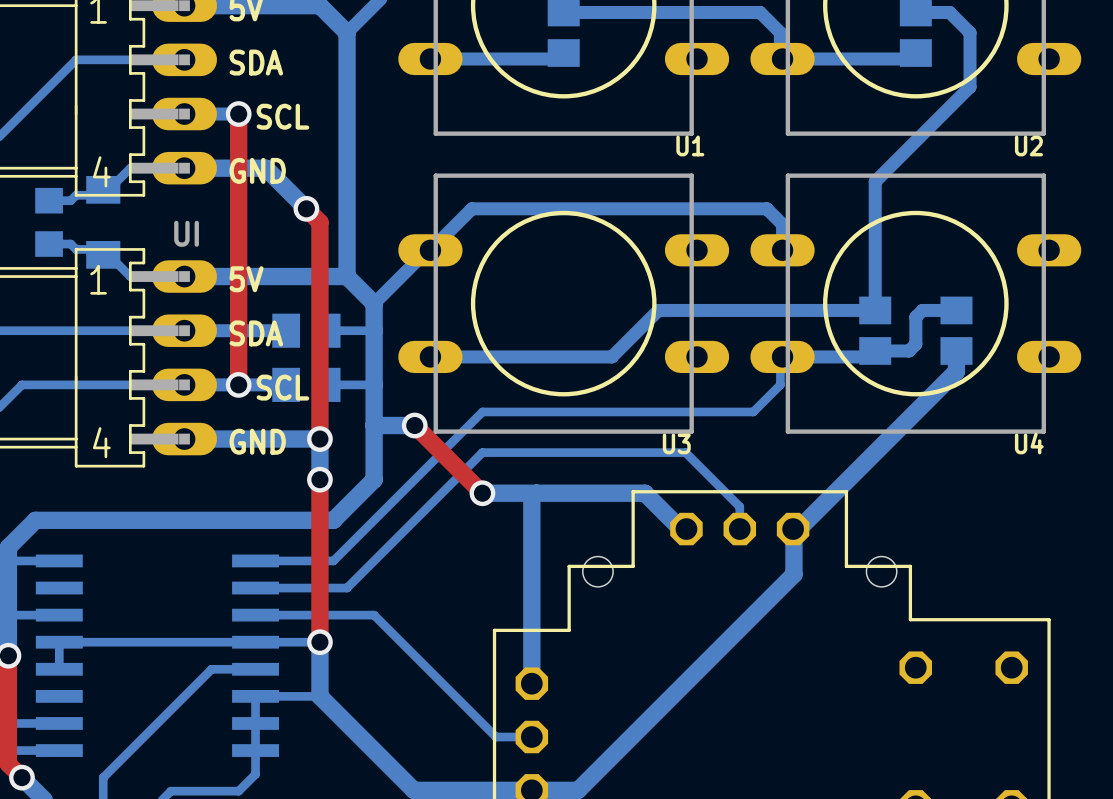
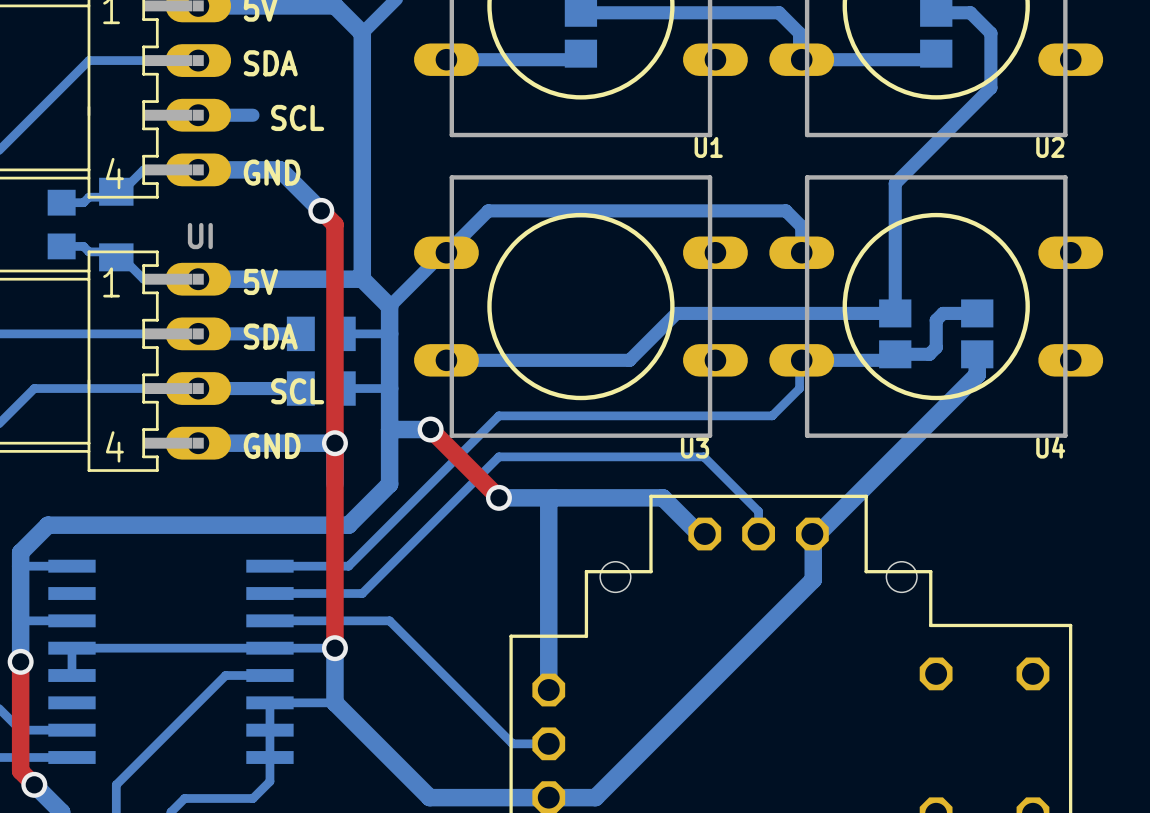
top track: (238, 114) (238, 384) -> none
via: (238, 114) -> none
via: (238, 384) -> none
top track: none -> (334, 443) (334, 484)
via: (319, 479) -> none

